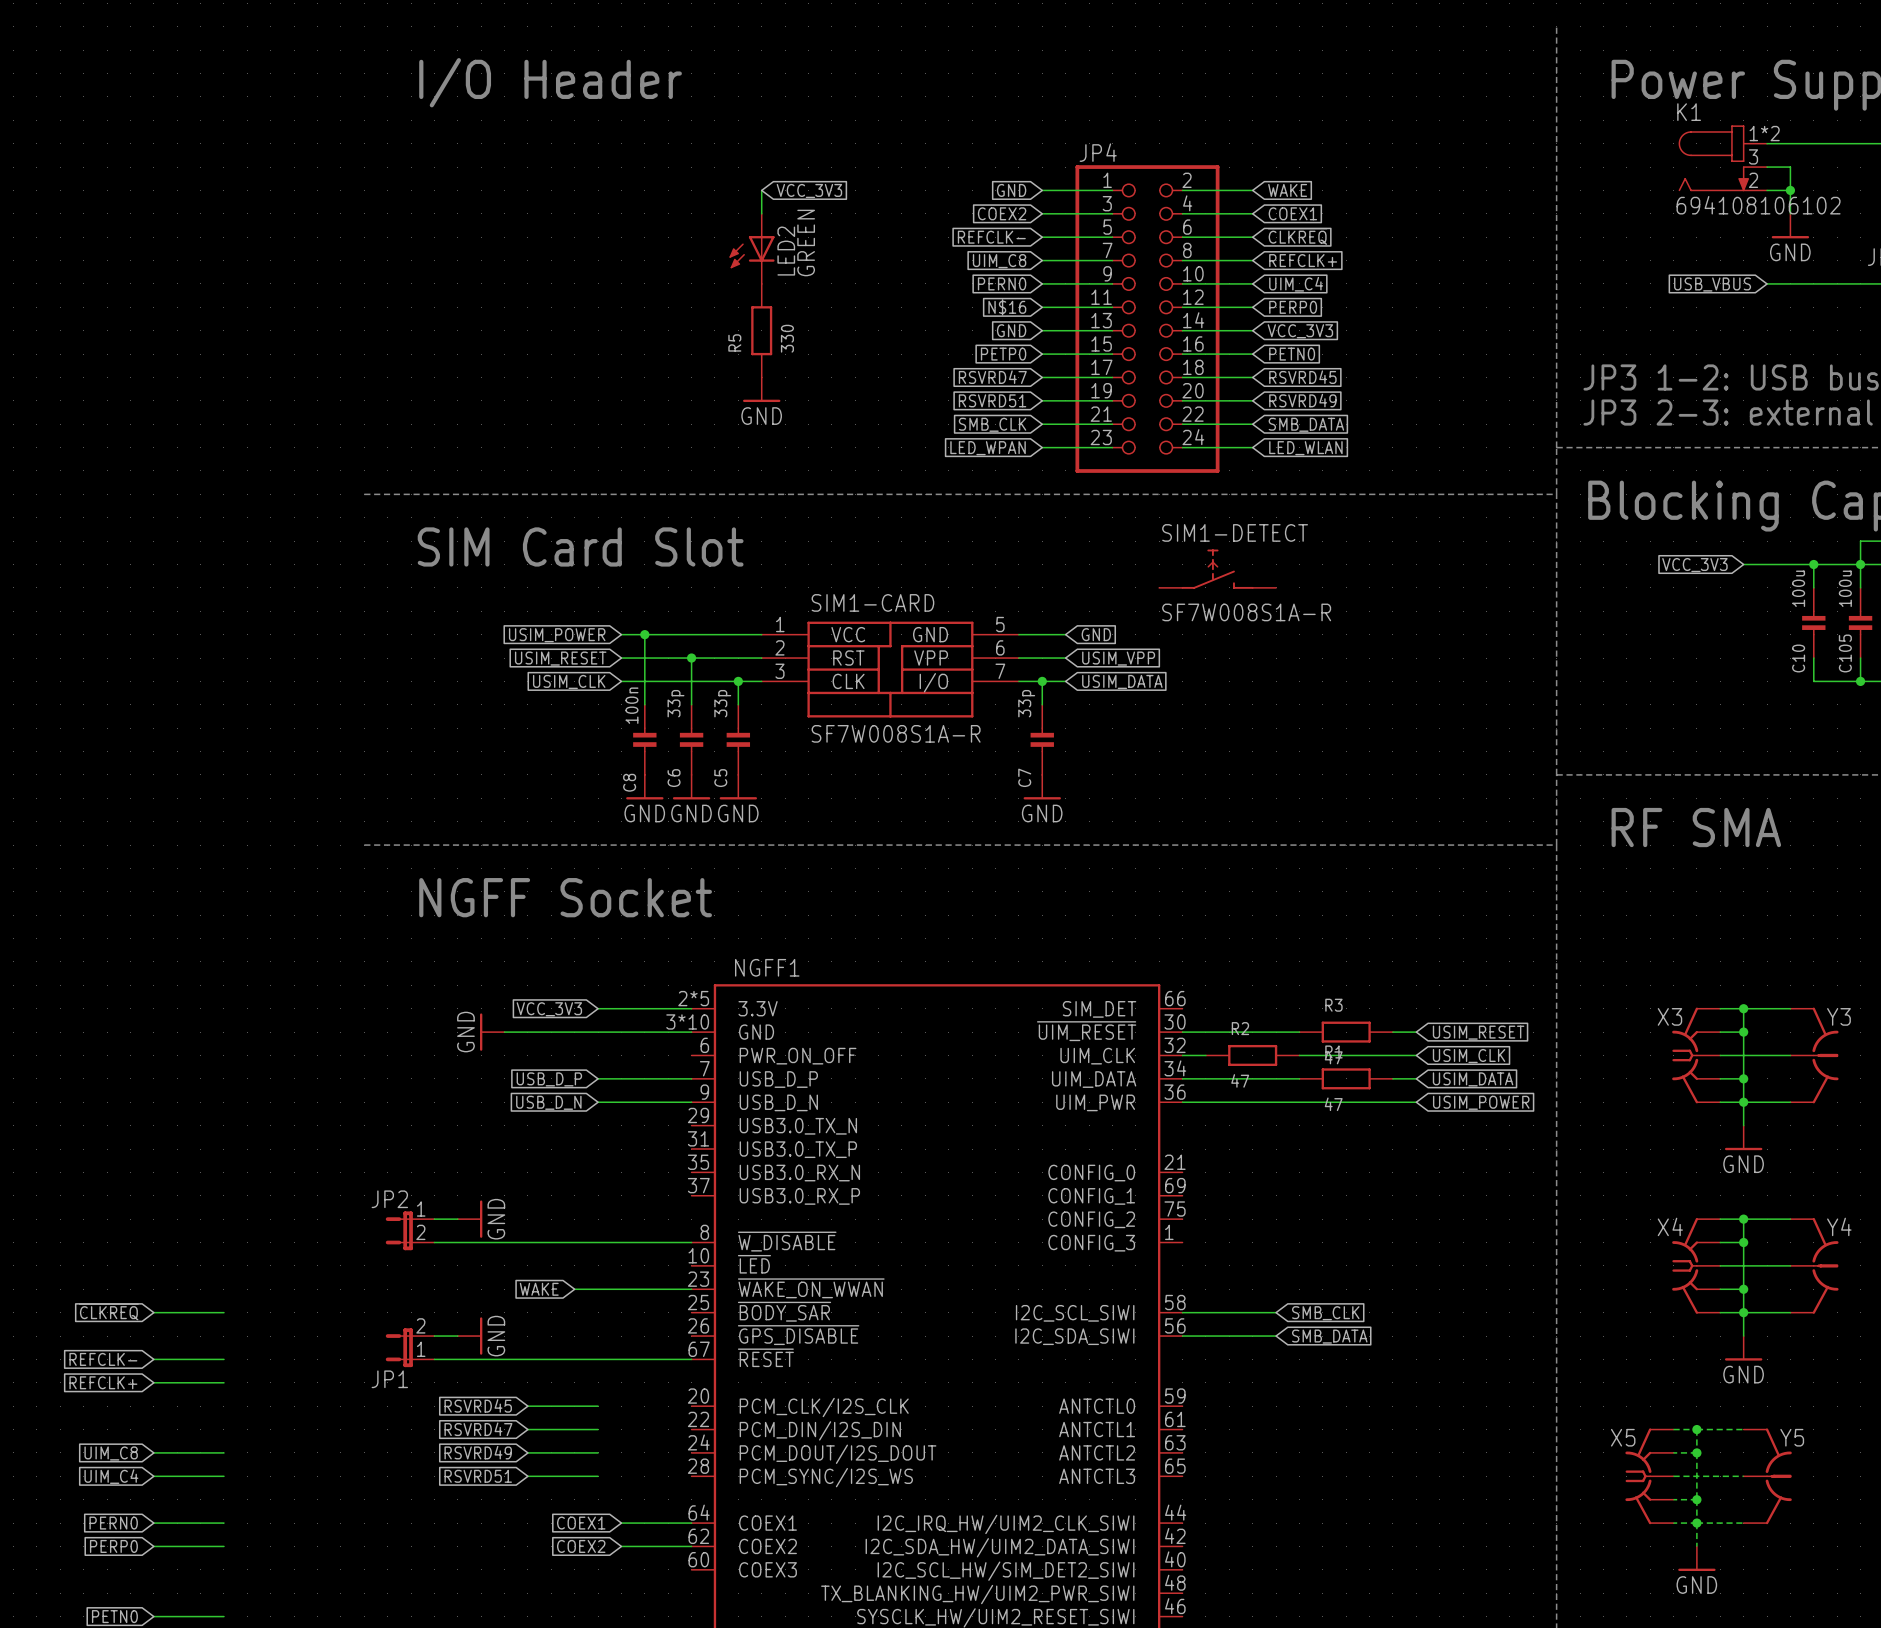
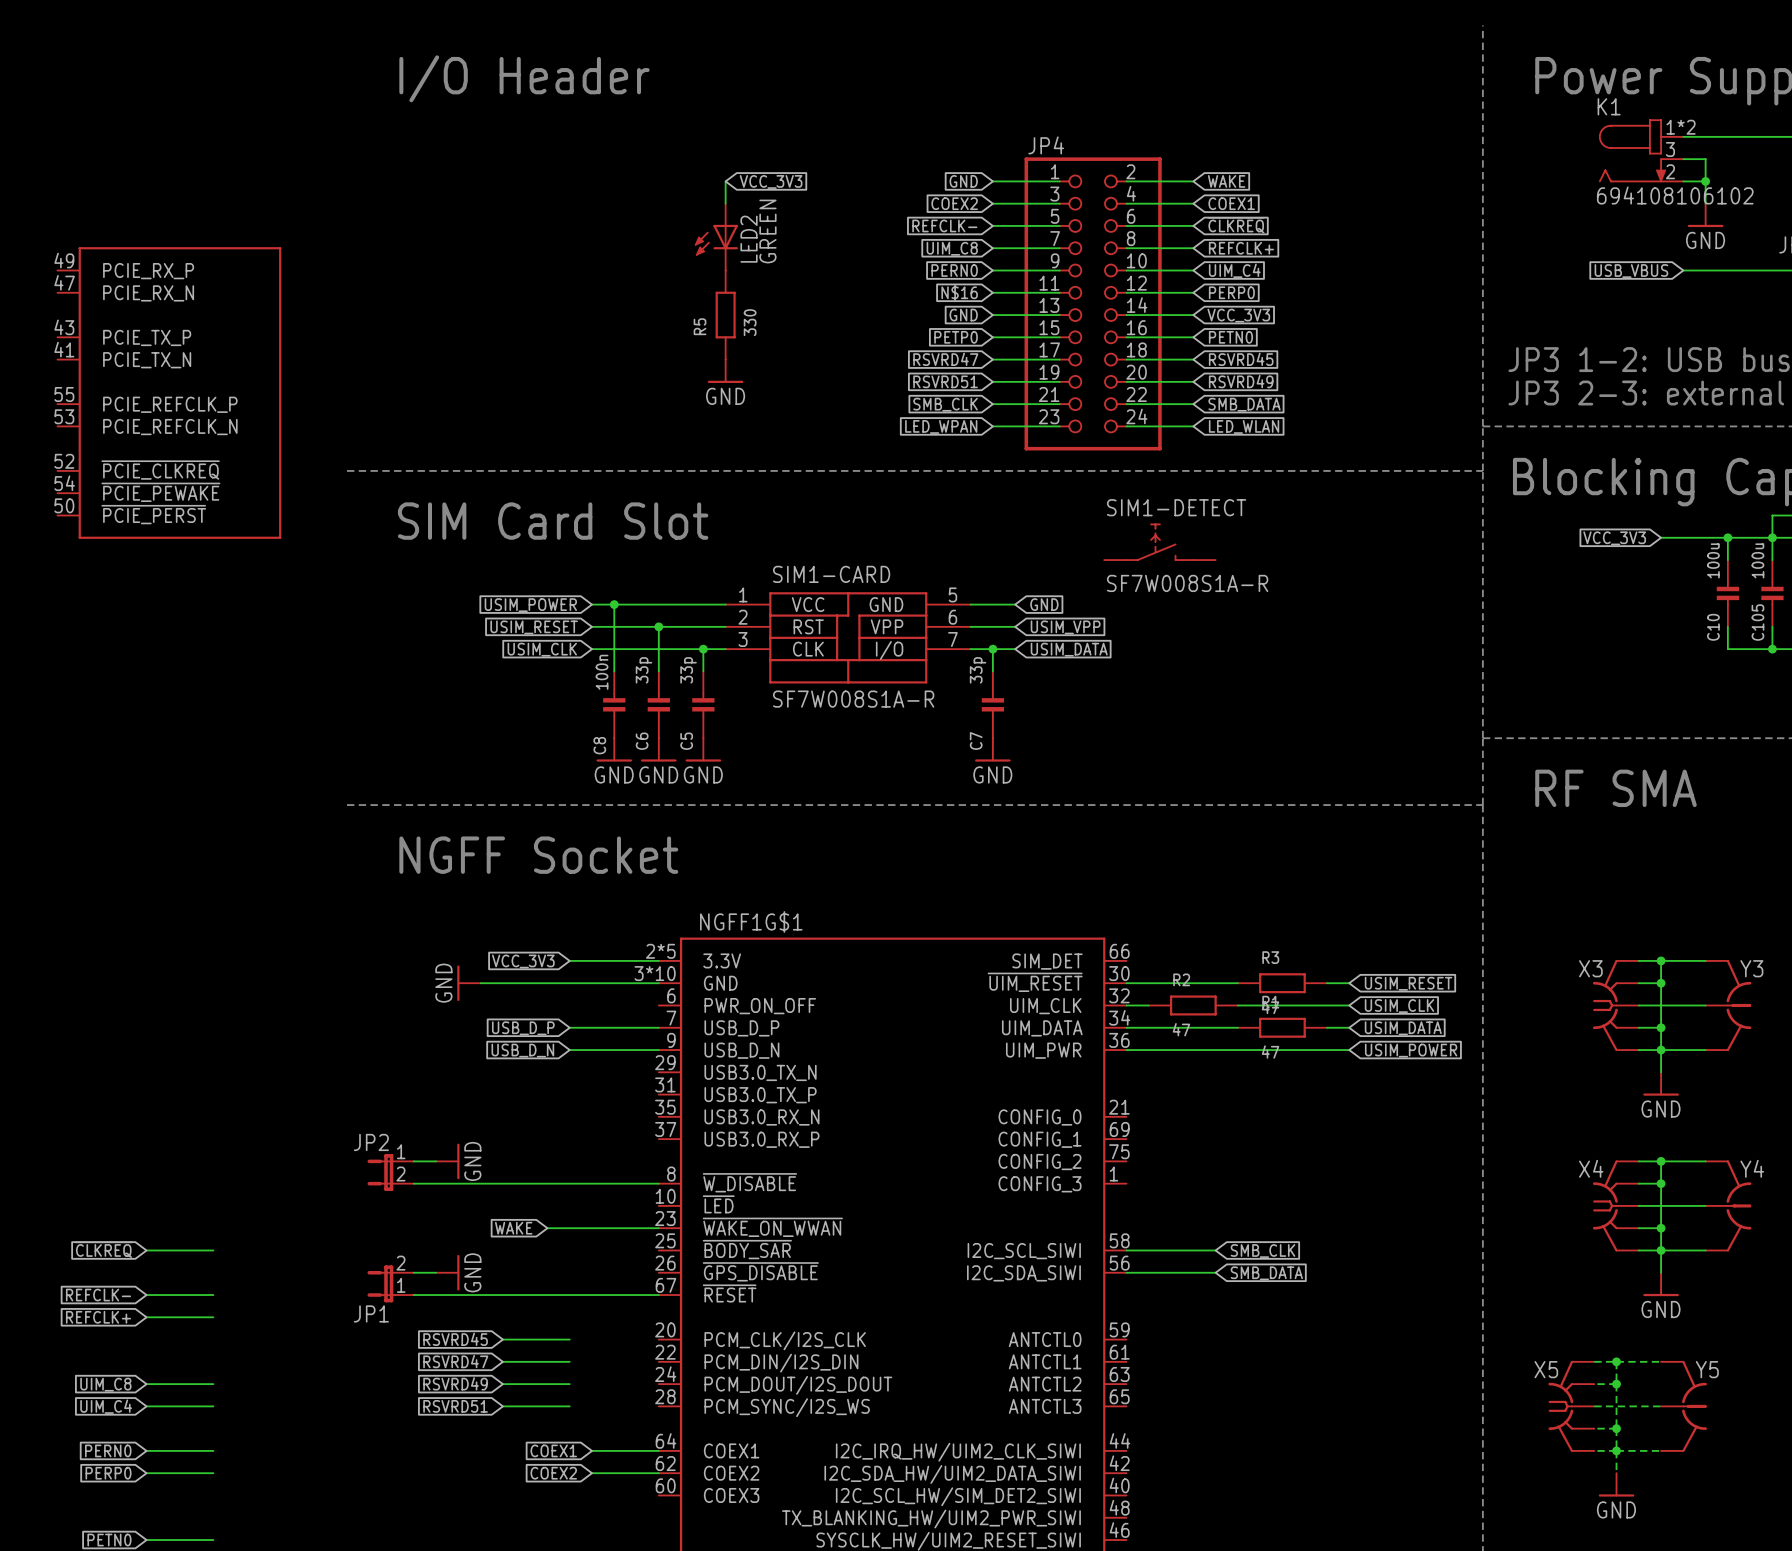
part: none -> (169, 393)
NGFF1 name: NGFF1 (767, 967) -> NGFF1G$1 (751, 921)

